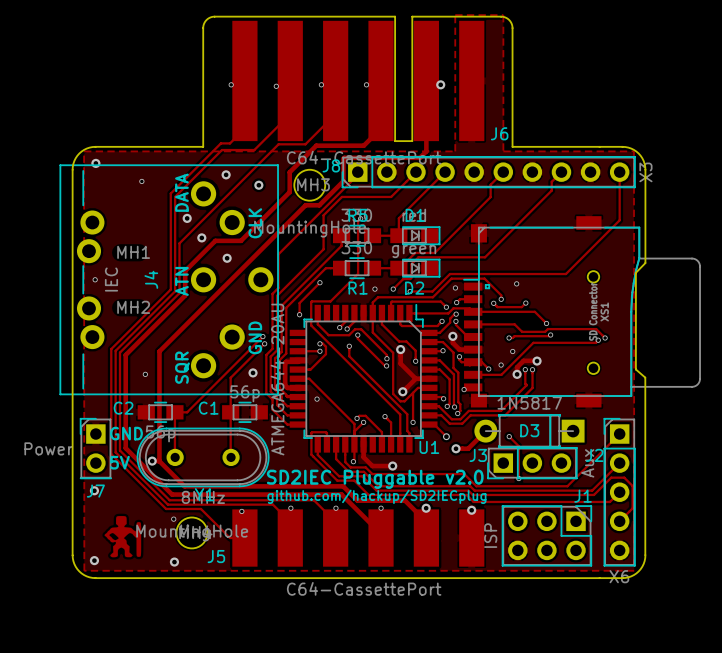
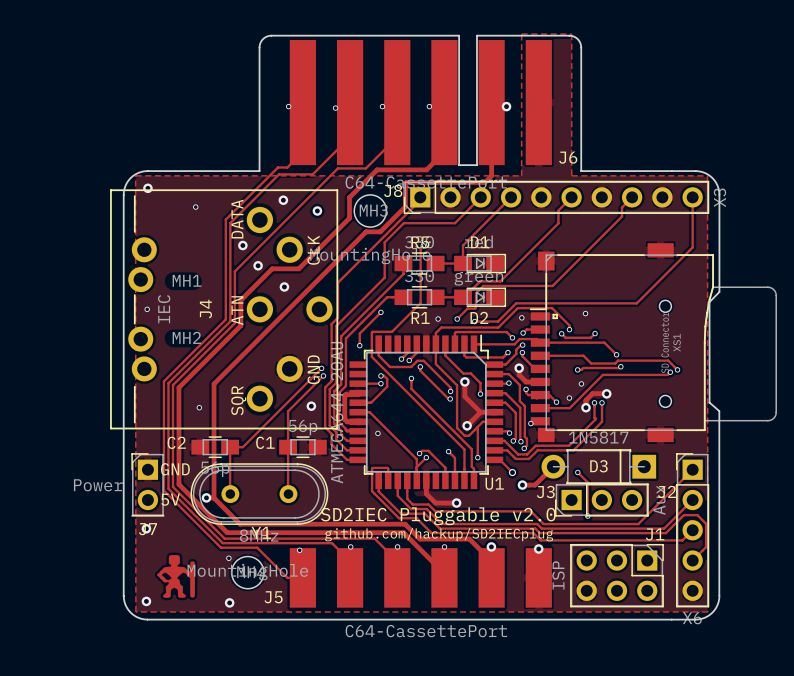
track: (354, 444) (353, 461) -> none
via: (353, 461) -> none

